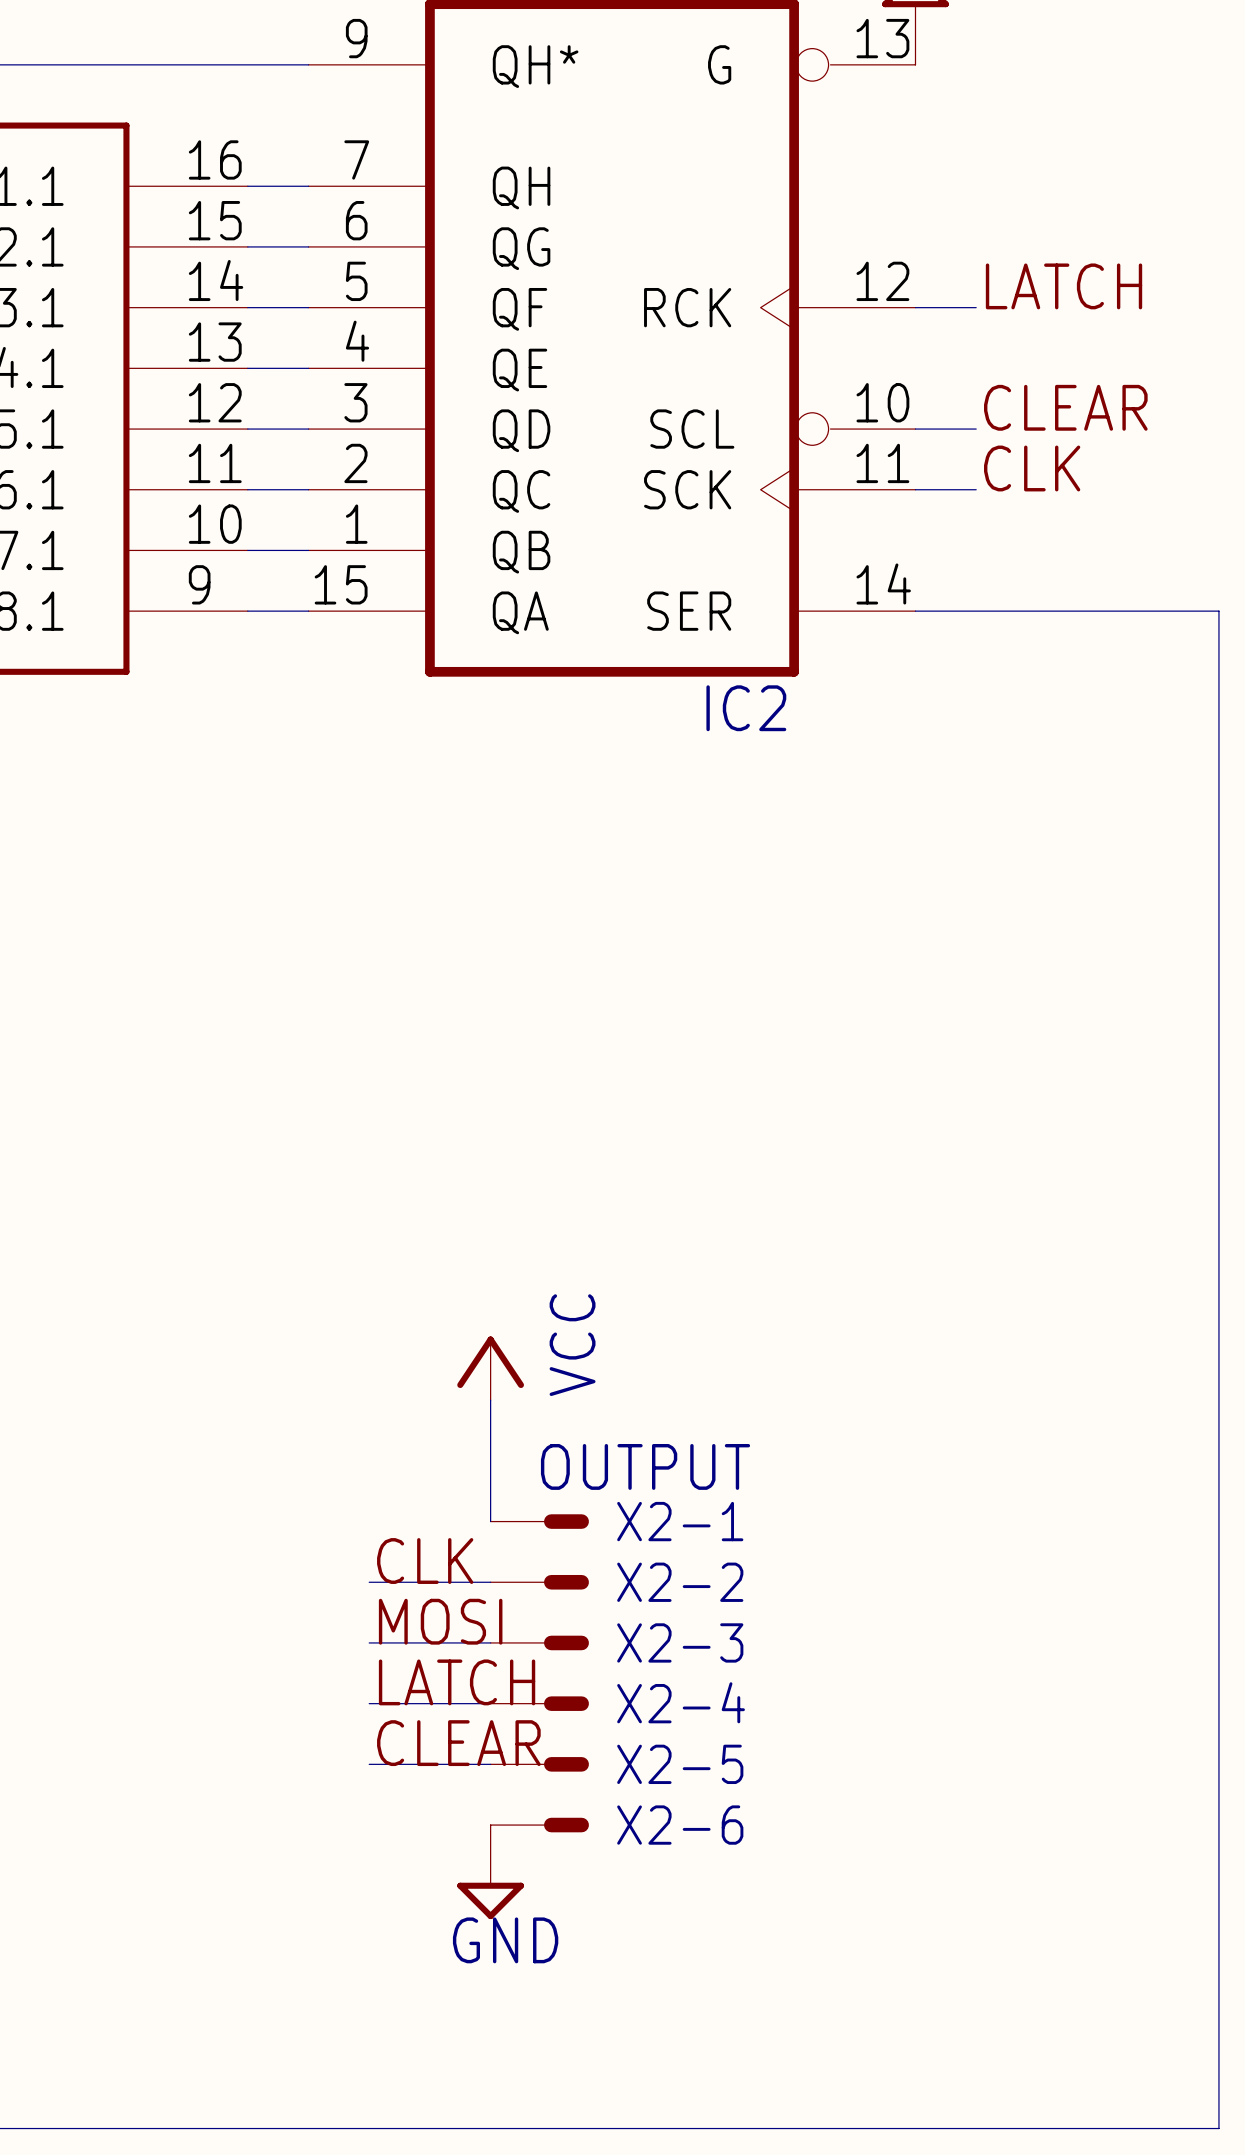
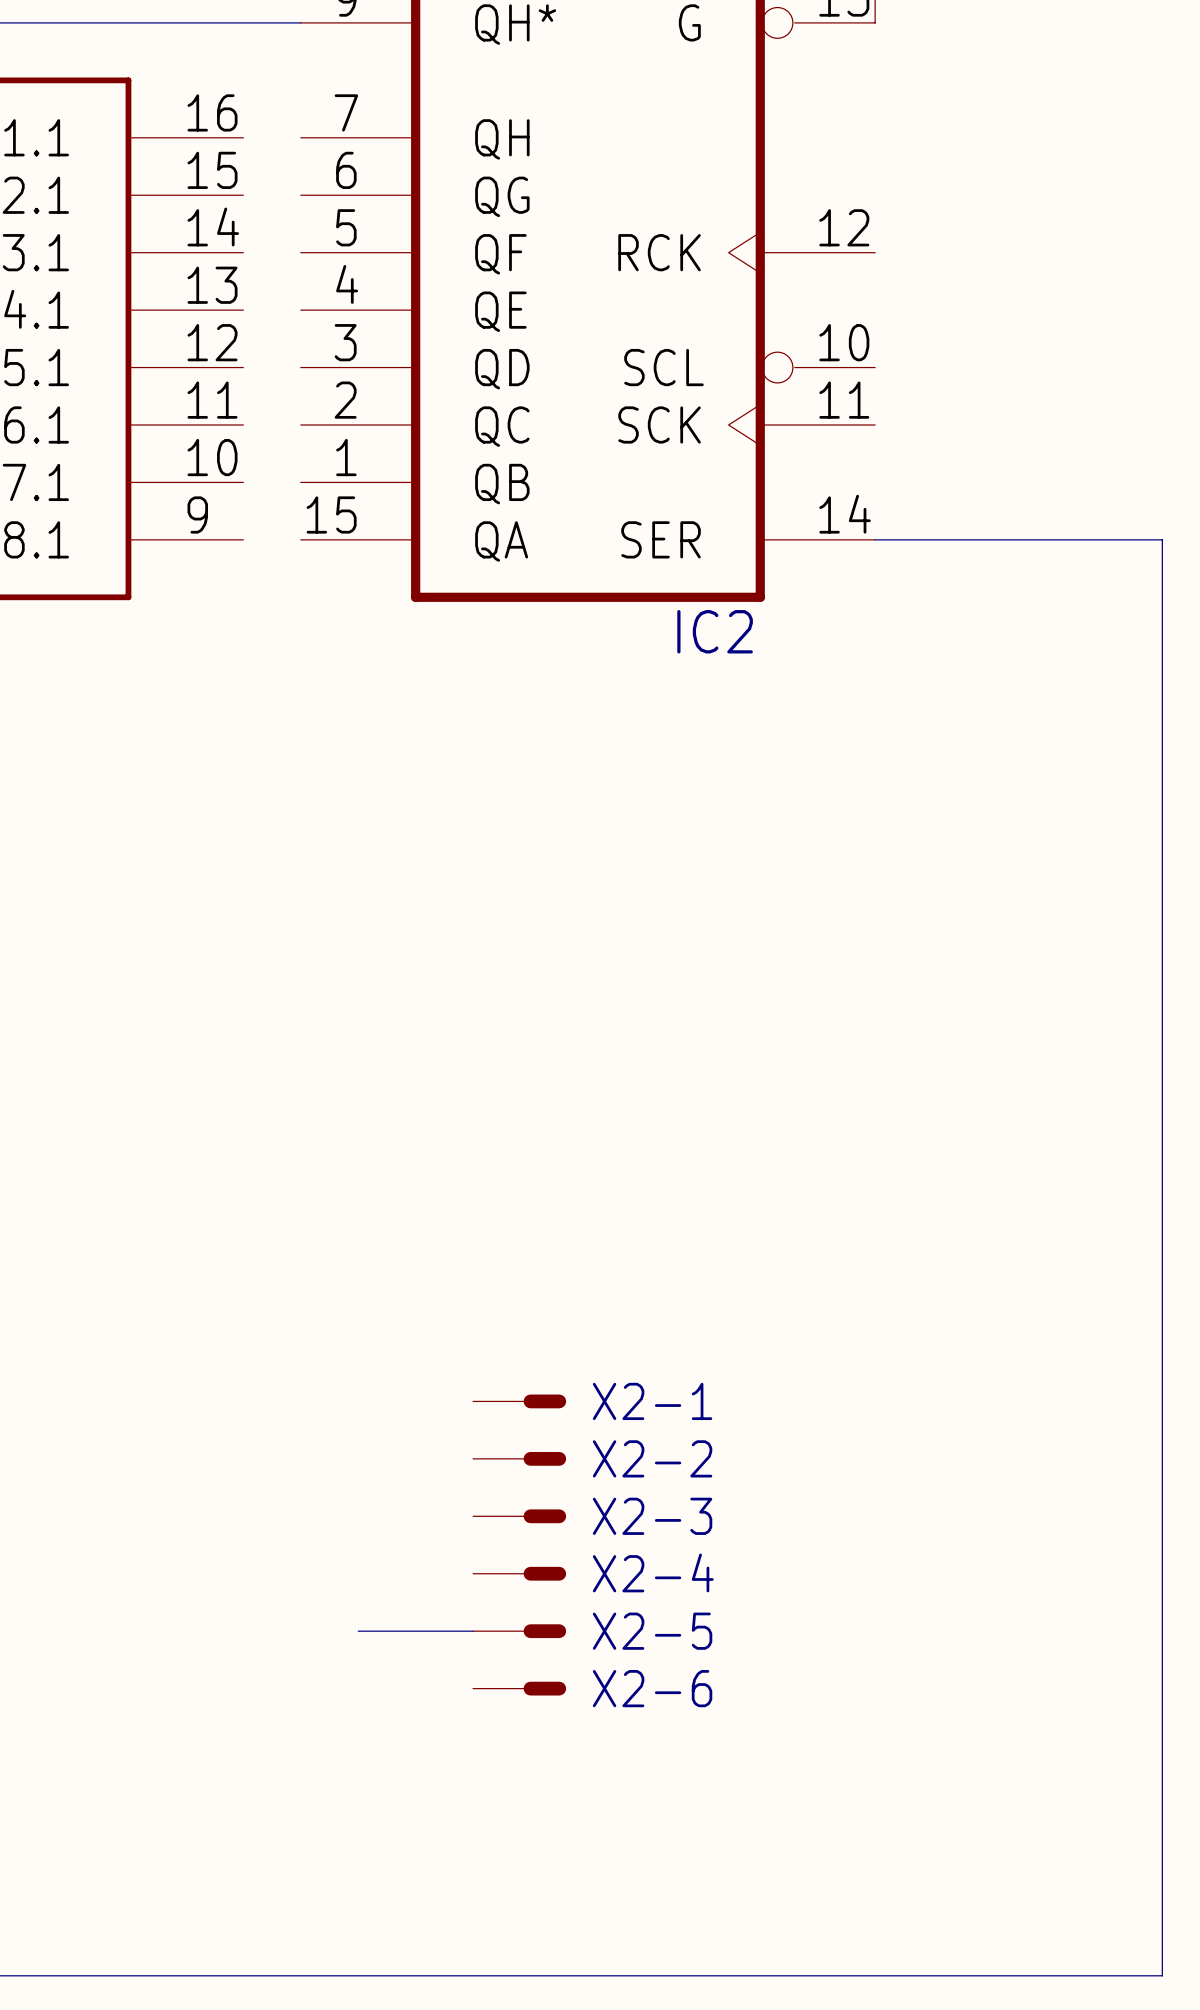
wire: (247, 186) (308, 186) -> none
wire: (247, 246) (308, 246) -> none
label: LATCH (1064, 286) -> none
wire: (247, 307) (308, 307) -> none
wire: (915, 307) (976, 307) -> none
wire: (247, 368) (308, 368) -> none
label: CLEAR (1065, 407) -> none
wire: (247, 429) (308, 429) -> none
wire: (915, 429) (976, 429) -> none
label: CLK (1032, 468) -> none
wire: (247, 489) (308, 489) -> none
wire: (915, 489) (976, 489) -> none
wire: (247, 550) (308, 550) -> none
wire: (247, 611) (308, 611) -> none
power symbol: VCC (490, 1368) -> none
wire: (490, 1400) (490, 1521) -> none
X2-1 value: OUTPUT (645, 1466) -> none
label: CLK (425, 1561) -> none
wire: (369, 1582) (490, 1582) -> none
label: MOSI (440, 1621) -> none
wire: (369, 1642) (490, 1642) -> none
label: LATCH (457, 1682) -> none
wire: (369, 1703) (490, 1703) -> none
label: CLEAR (458, 1743) -> none
power symbol: GND (490, 1872) -> none

